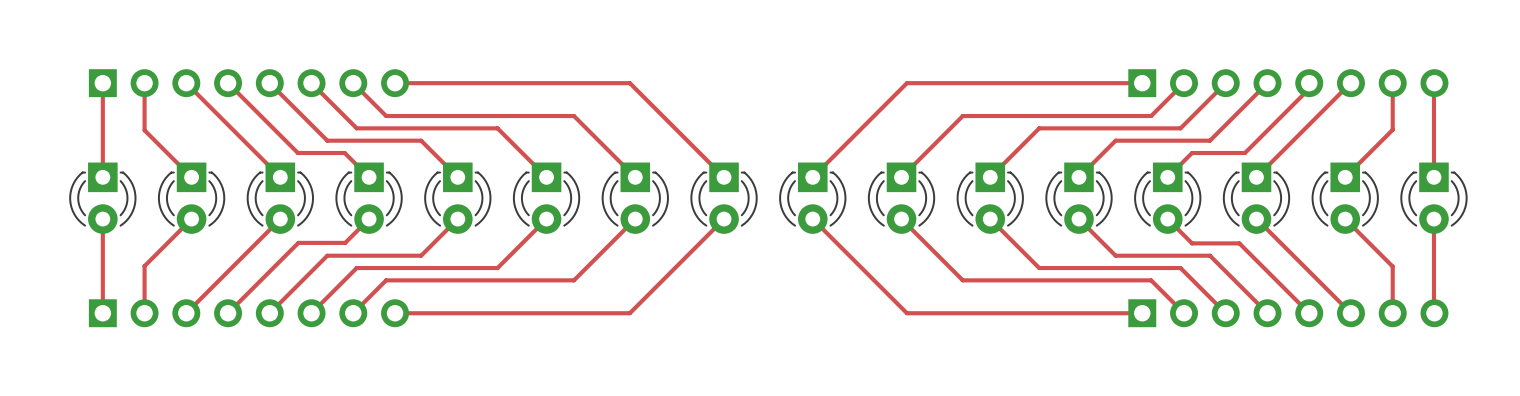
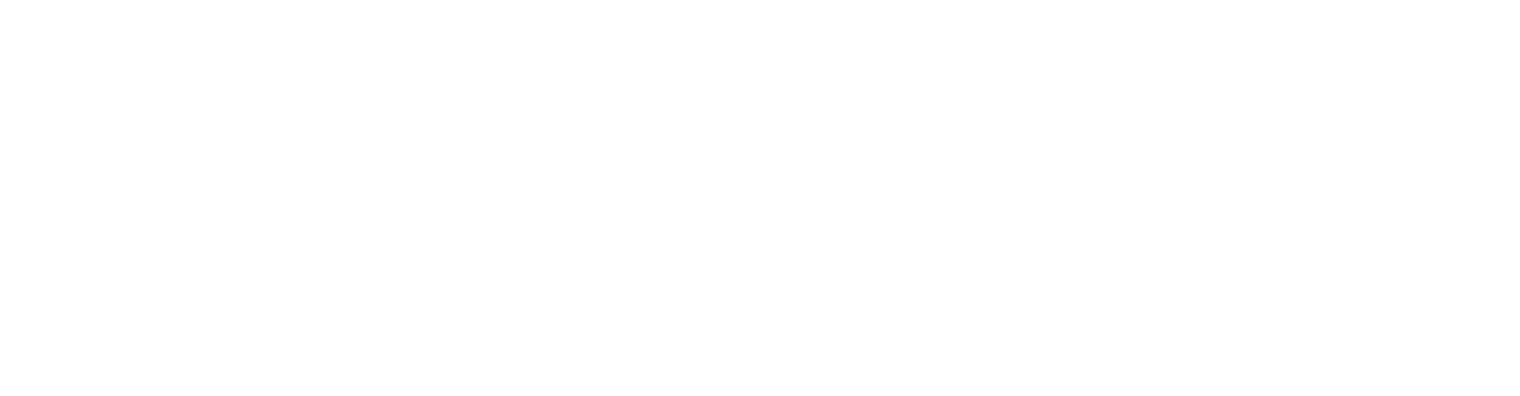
track: (102, 83) (102, 177) -> none
track: (144, 83) (144, 130) (191, 177) -> none
track: (186, 83) (280, 177) -> none
track: (228, 83) (297, 153) (344, 153) (369, 177) -> none
part: (248, 83) -> none
track: (269, 83) (327, 140) (421, 140) (457, 177) -> none
track: (311, 83) (356, 128) (497, 128) (546, 177) -> none
track: (353, 83) (386, 116) (573, 116) (635, 177) -> none
track: (395, 83) (629, 83) (724, 177) -> none
track: (1142, 83) (906, 83) (812, 177) -> none
track: (1184, 83) (1151, 116) (962, 116) (901, 177) -> none
track: (1225, 83) (1180, 128) (1039, 128) (990, 177) -> none
track: (1267, 83) (1209, 140) (1115, 140) (1079, 177) -> none
part: (1288, 83) -> none
track: (1309, 83) (1309, 88) (1244, 153) (1192, 153) (1167, 177) -> none
track: (1350, 83) (1256, 177) -> none
track: (1392, 83) (1392, 129) (1345, 177) -> none
track: (1434, 83) (1433, 177) -> none
part: (102, 198) -> none
part: (191, 198) -> none
part: (280, 198) -> none
part: (369, 198) -> none
part: (457, 198) -> none
part: (546, 198) -> none
part: (635, 198) -> none
part: (724, 198) -> none
part: (812, 198) -> none
part: (901, 198) -> none
part: (990, 198) -> none
part: (1079, 198) -> none
part: (1167, 198) -> none
part: (1256, 198) -> none
part: (1345, 198) -> none
part: (1433, 198) -> none
track: (102, 219) (102, 313) -> none
track: (191, 219) (144, 266) (144, 313) -> none
track: (280, 219) (186, 313) -> none
track: (369, 219) (345, 242) (298, 242) (228, 313) -> none
track: (457, 219) (421, 255) (327, 255) (269, 313) -> none
track: (546, 219) (497, 268) (356, 268) (311, 313) -> none
track: (635, 219) (573, 280) (386, 280) (353, 313) -> none
track: (724, 219) (629, 313) (395, 313) -> none
track: (812, 219) (906, 313) (1142, 313) -> none
track: (901, 219) (962, 280) (1151, 280) (1184, 313) -> none
track: (990, 219) (1039, 268) (1180, 268) (1225, 313) -> none
track: (1079, 219) (1115, 255) (1209, 255) (1267, 313) -> none
track: (1167, 219) (1192, 243) (1239, 243) (1309, 313) -> none
track: (1256, 219) (1350, 313) -> none
track: (1345, 219) (1392, 266) (1392, 313) -> none
track: (1433, 219) (1434, 313) -> none
part: (248, 313) -> none
part: (1288, 313) -> none

